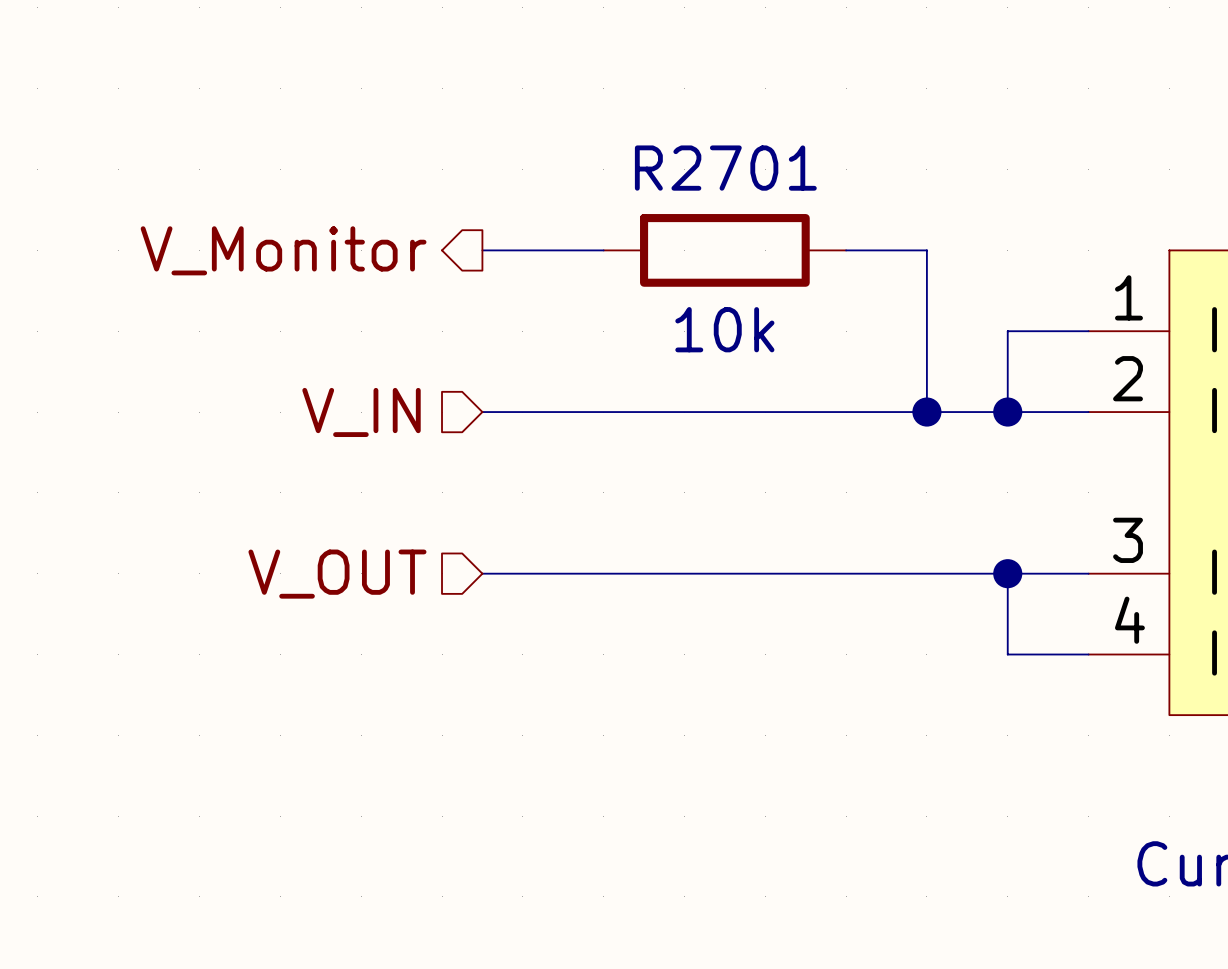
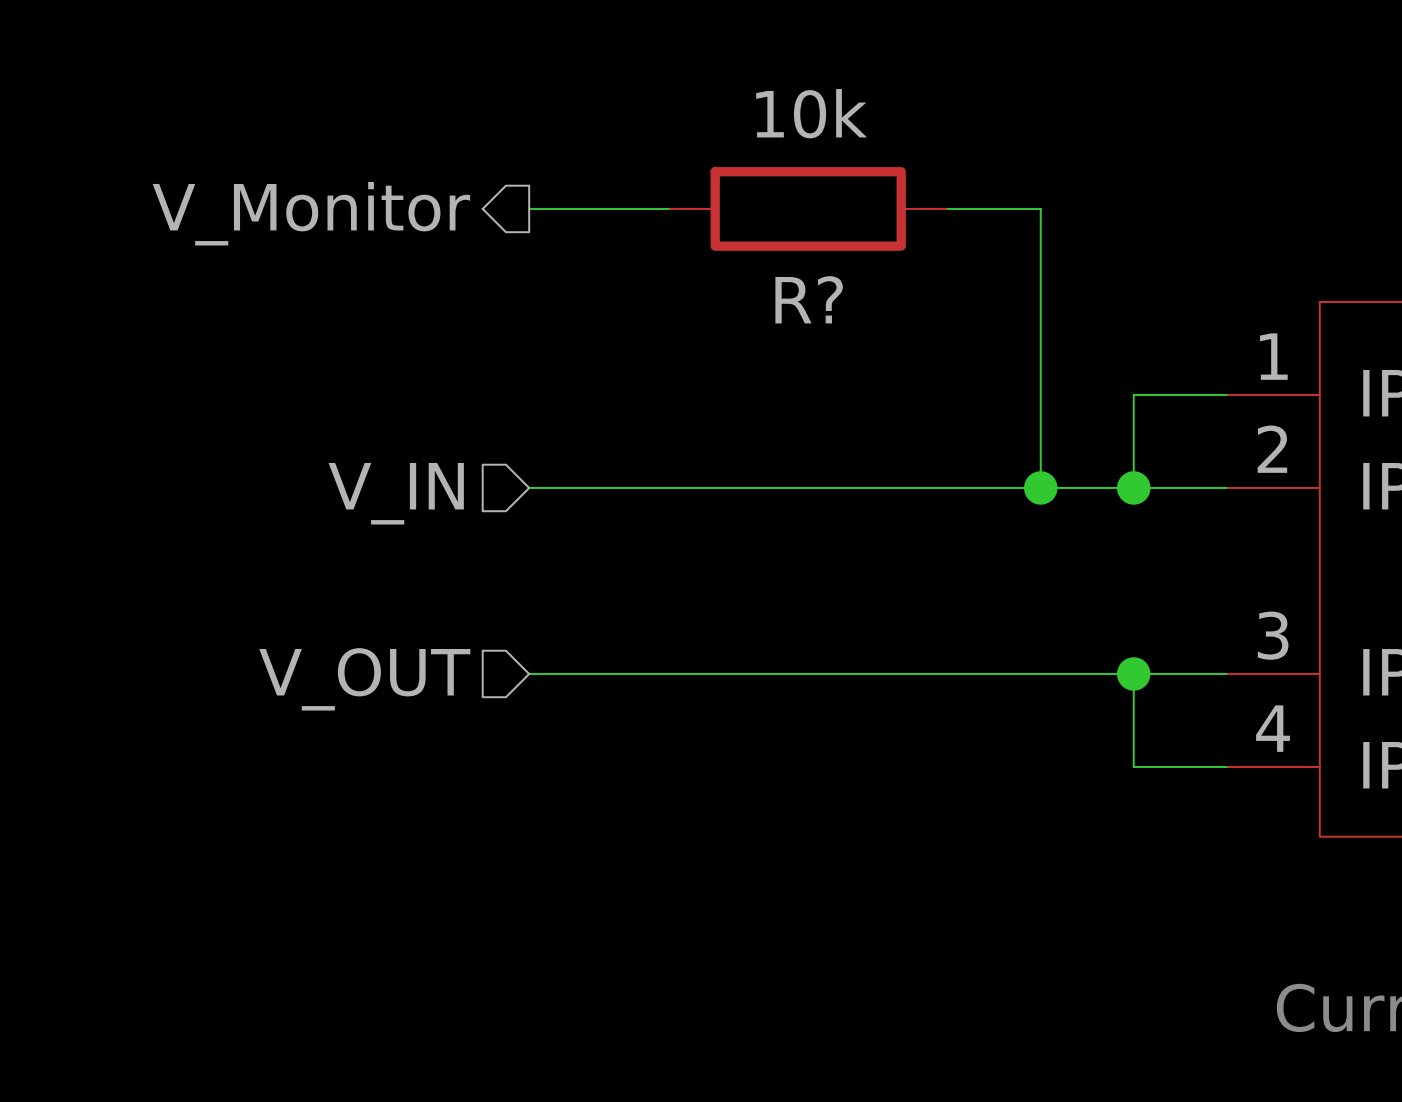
R?: none -> 10k (808, 208)
hierarchical label position: V_Monitor (283, 250) -> V_Monitor (311, 213)
wire: (482, 250) (603, 250) -> (529, 208) (668, 208)
R2701: 10k (724, 250) -> none
wire: (846, 250) (926, 250) -> (947, 208) (1040, 208) (1040, 301)

